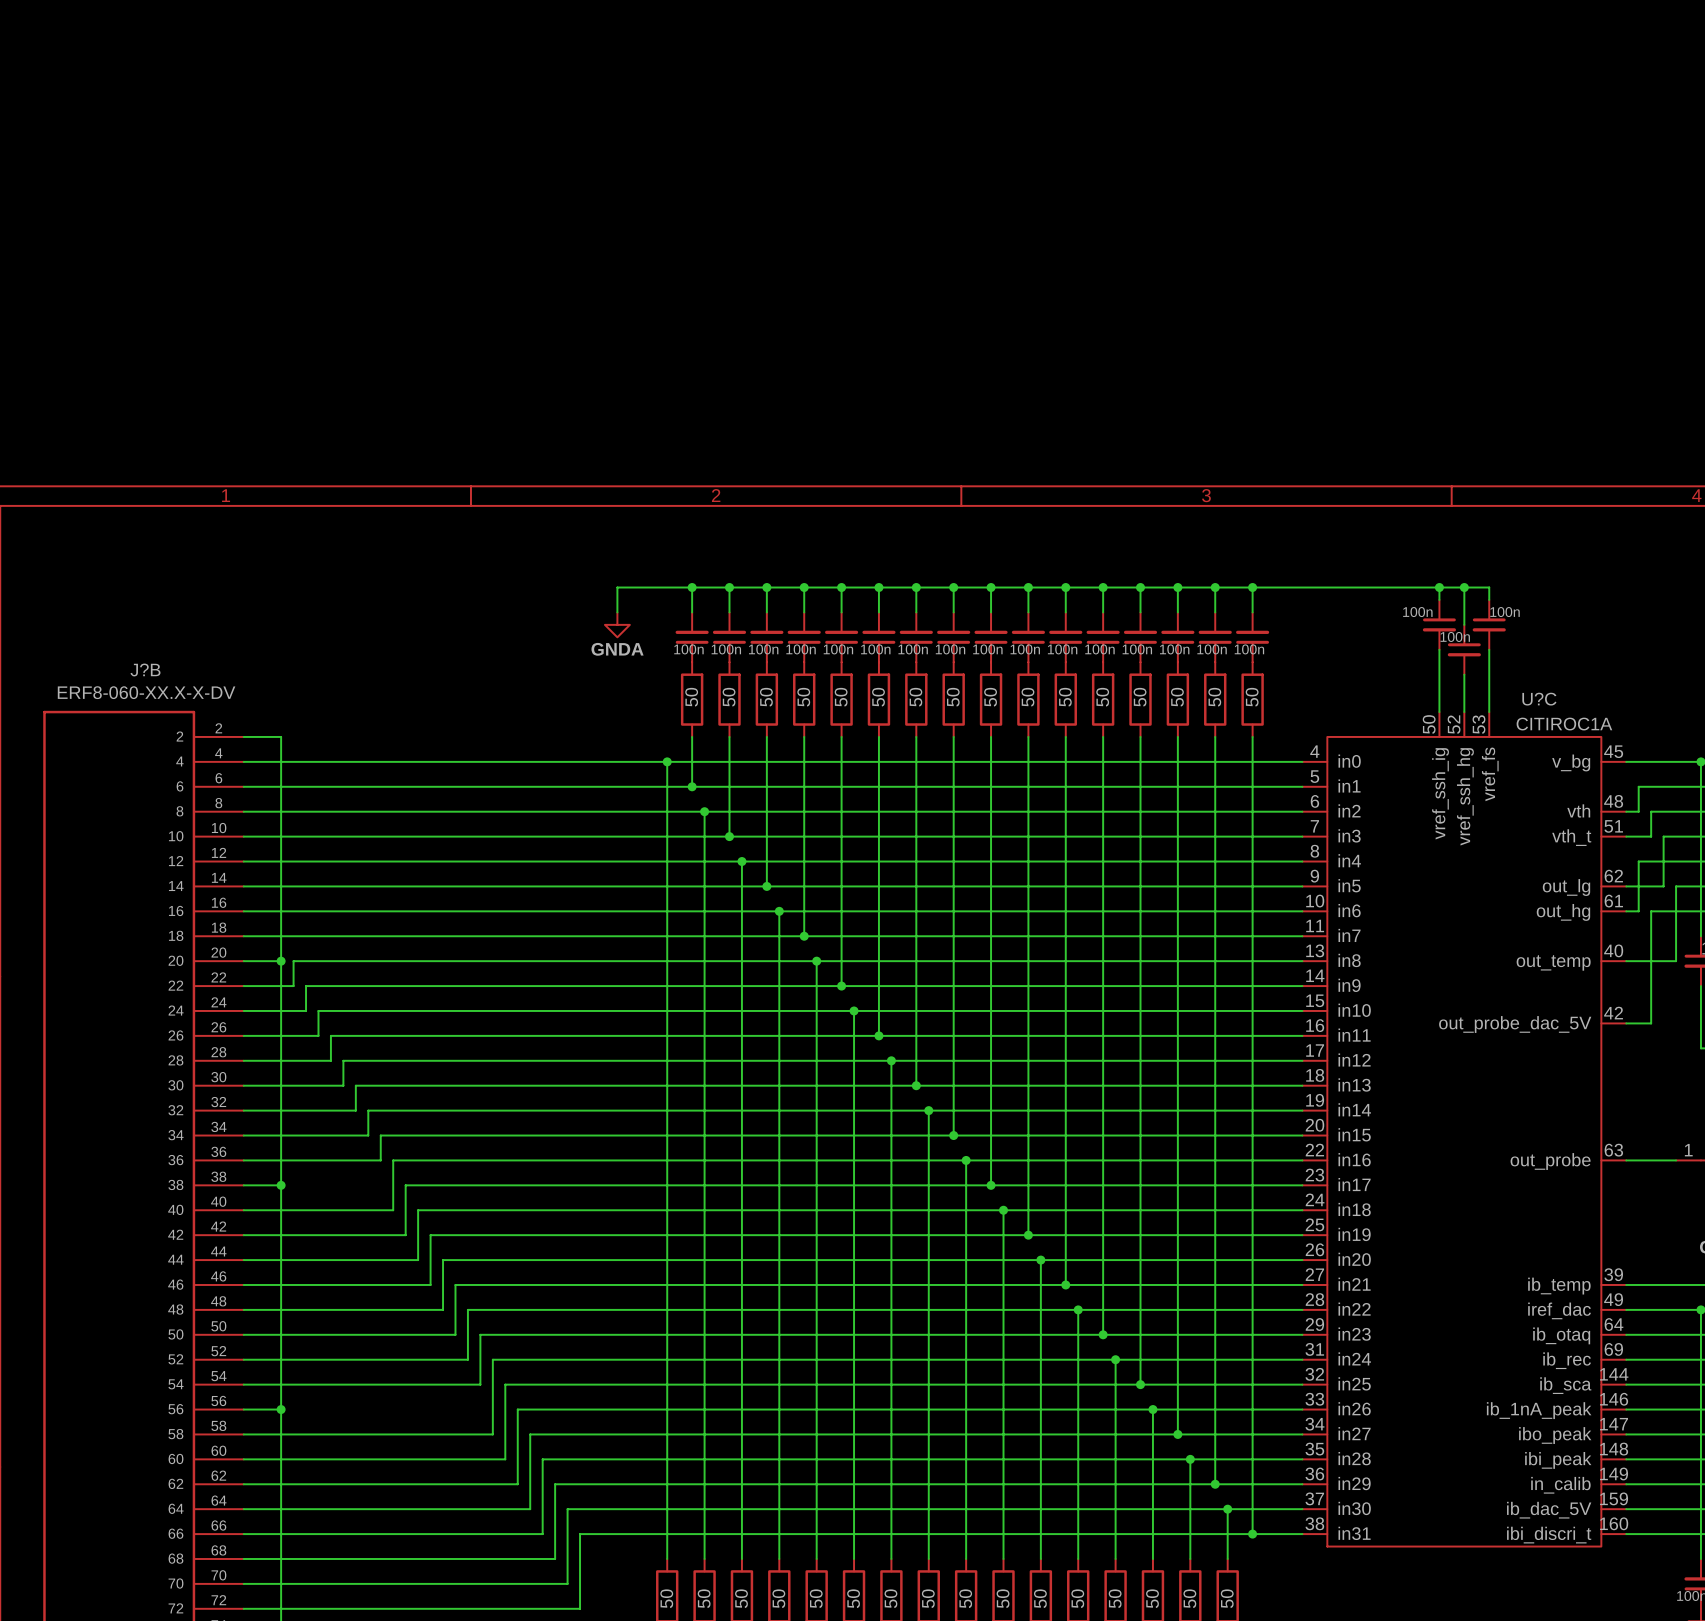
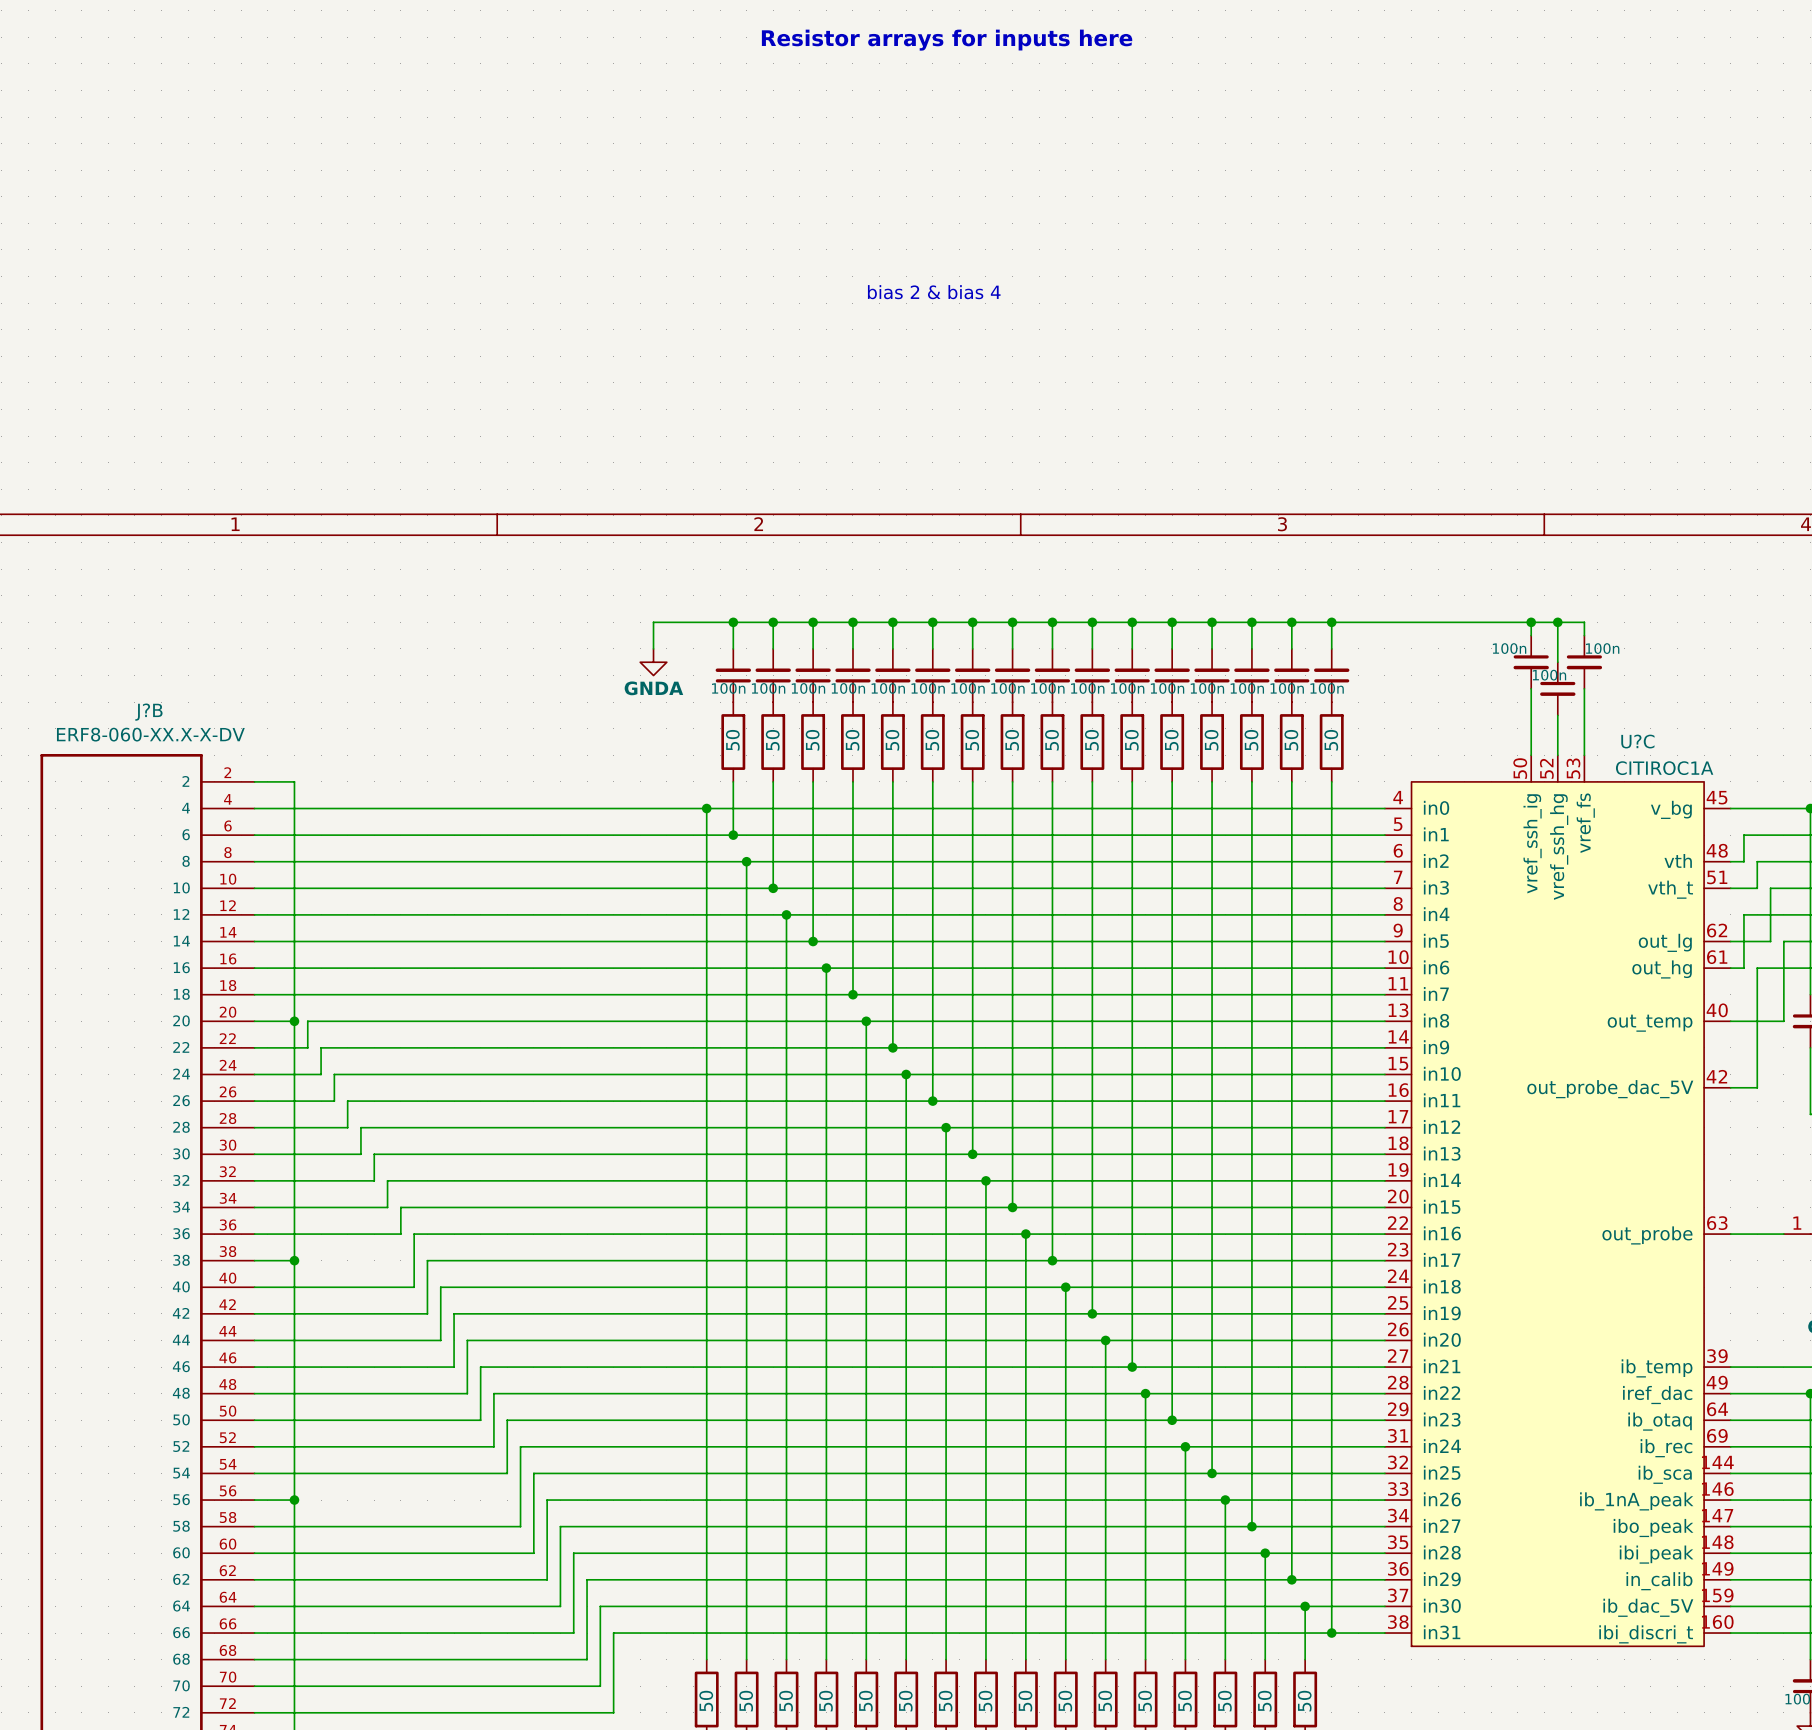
text: none -> Resistor arrays for inputs here (947, 40)
text: none -> bias 2 & bias 4 (934, 292)

